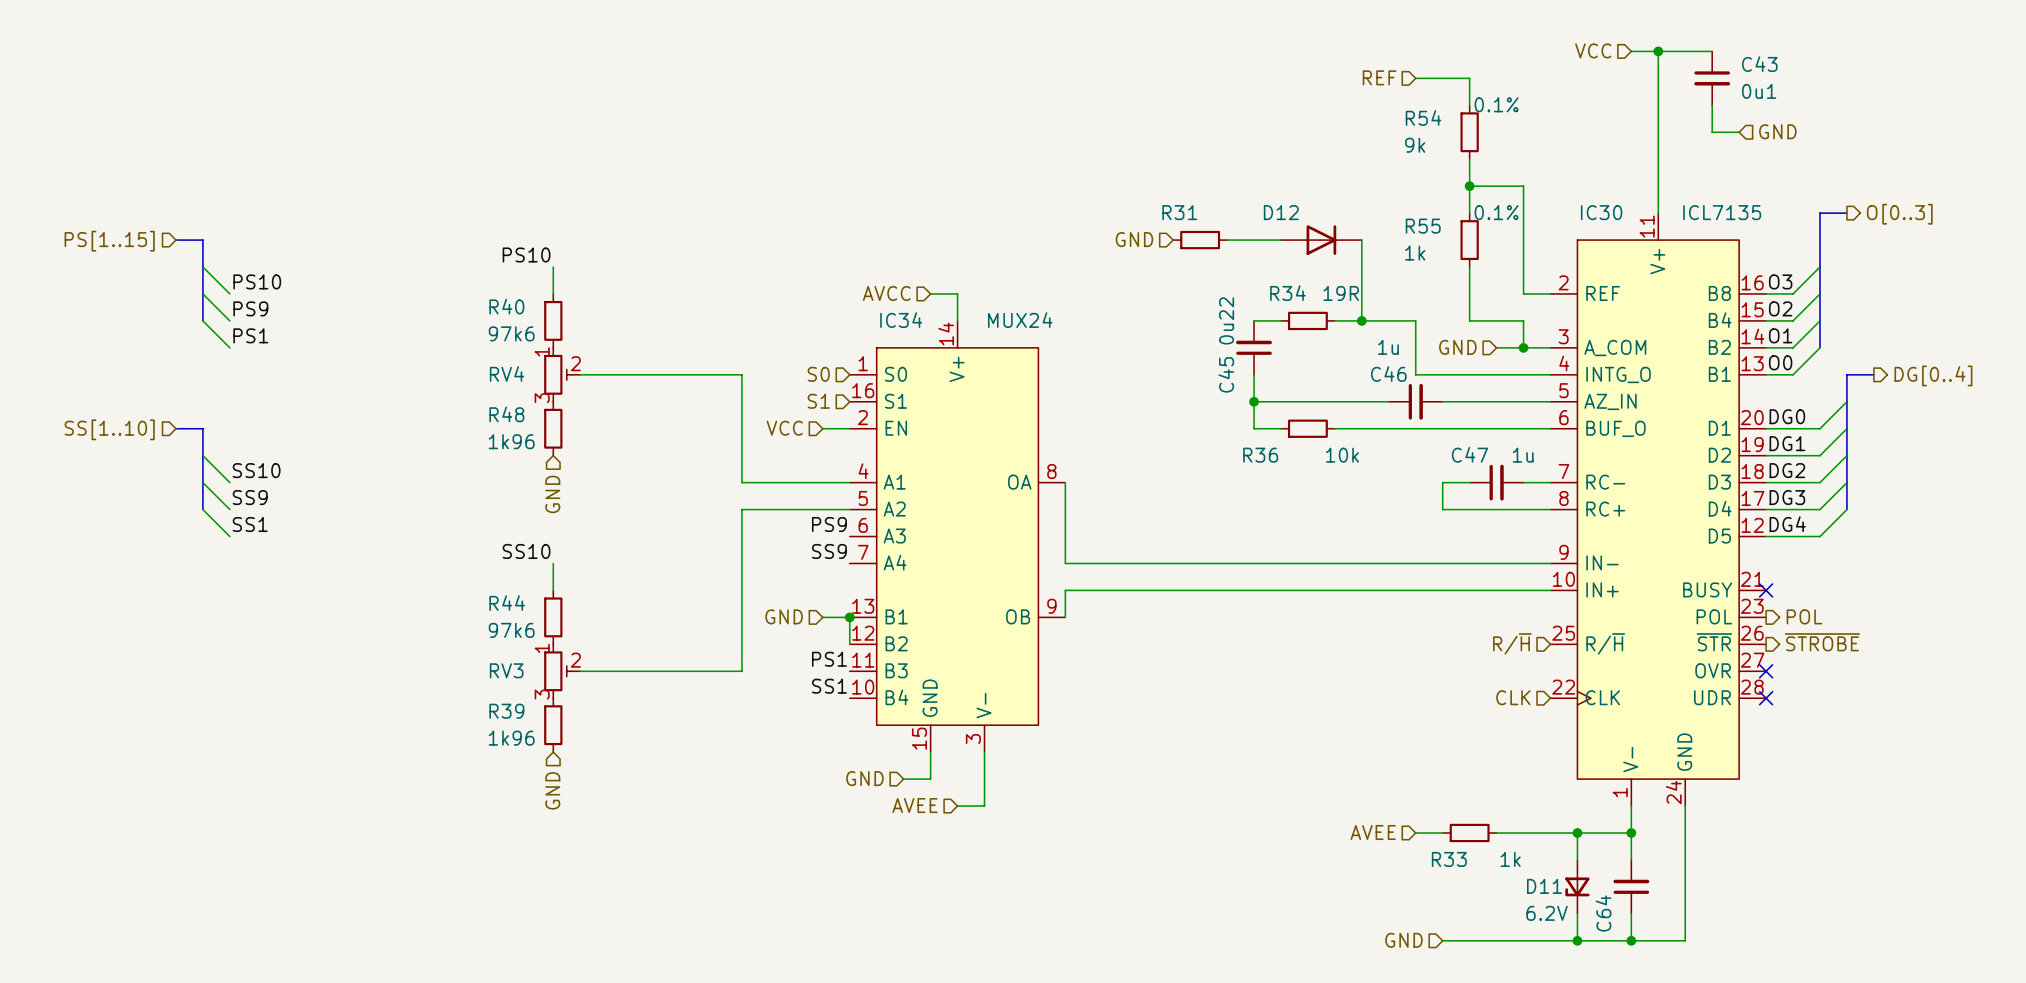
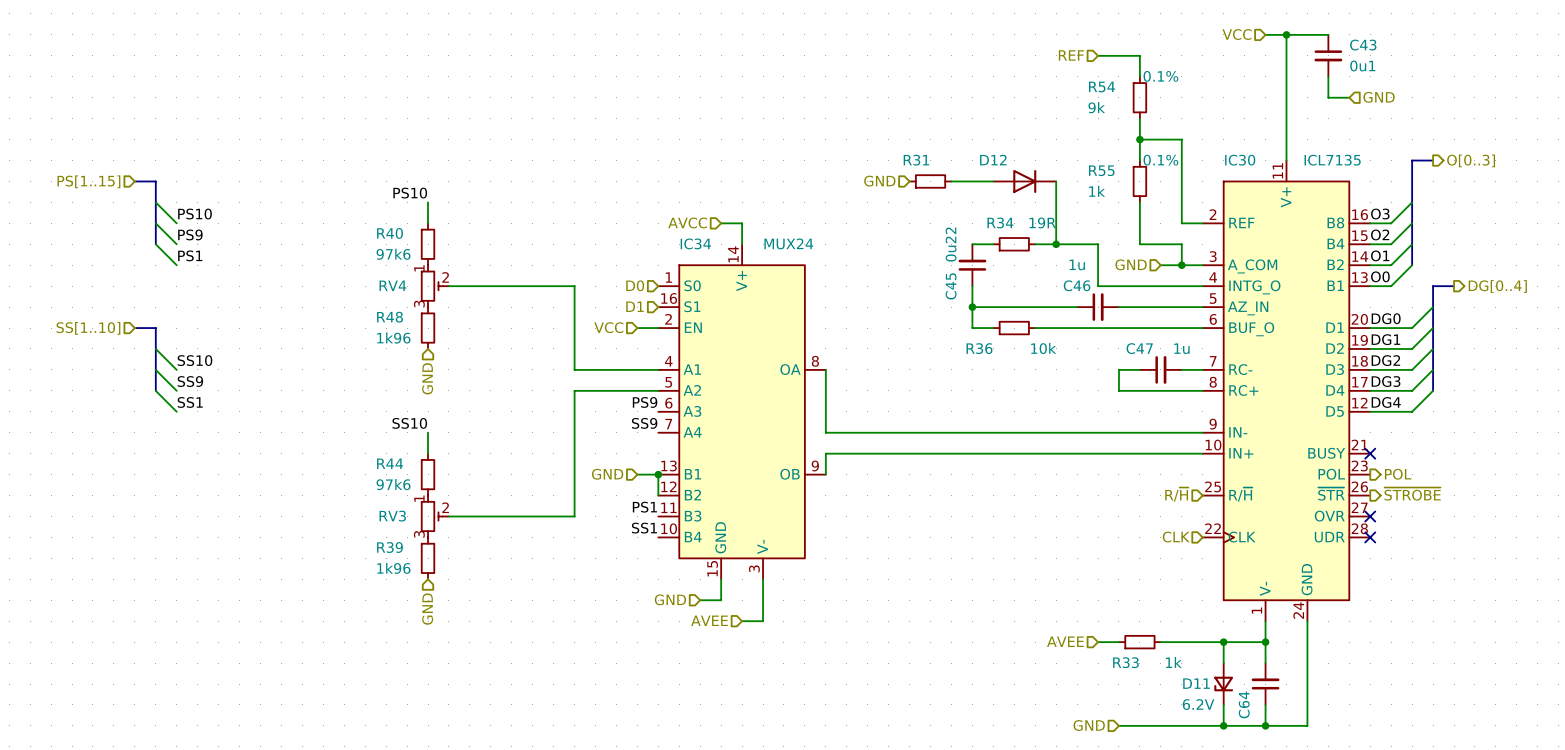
hierarchical label: S0 (818, 374) -> D0 (635, 285)
hierarchical label: S1 (818, 401) -> D1 (634, 306)

